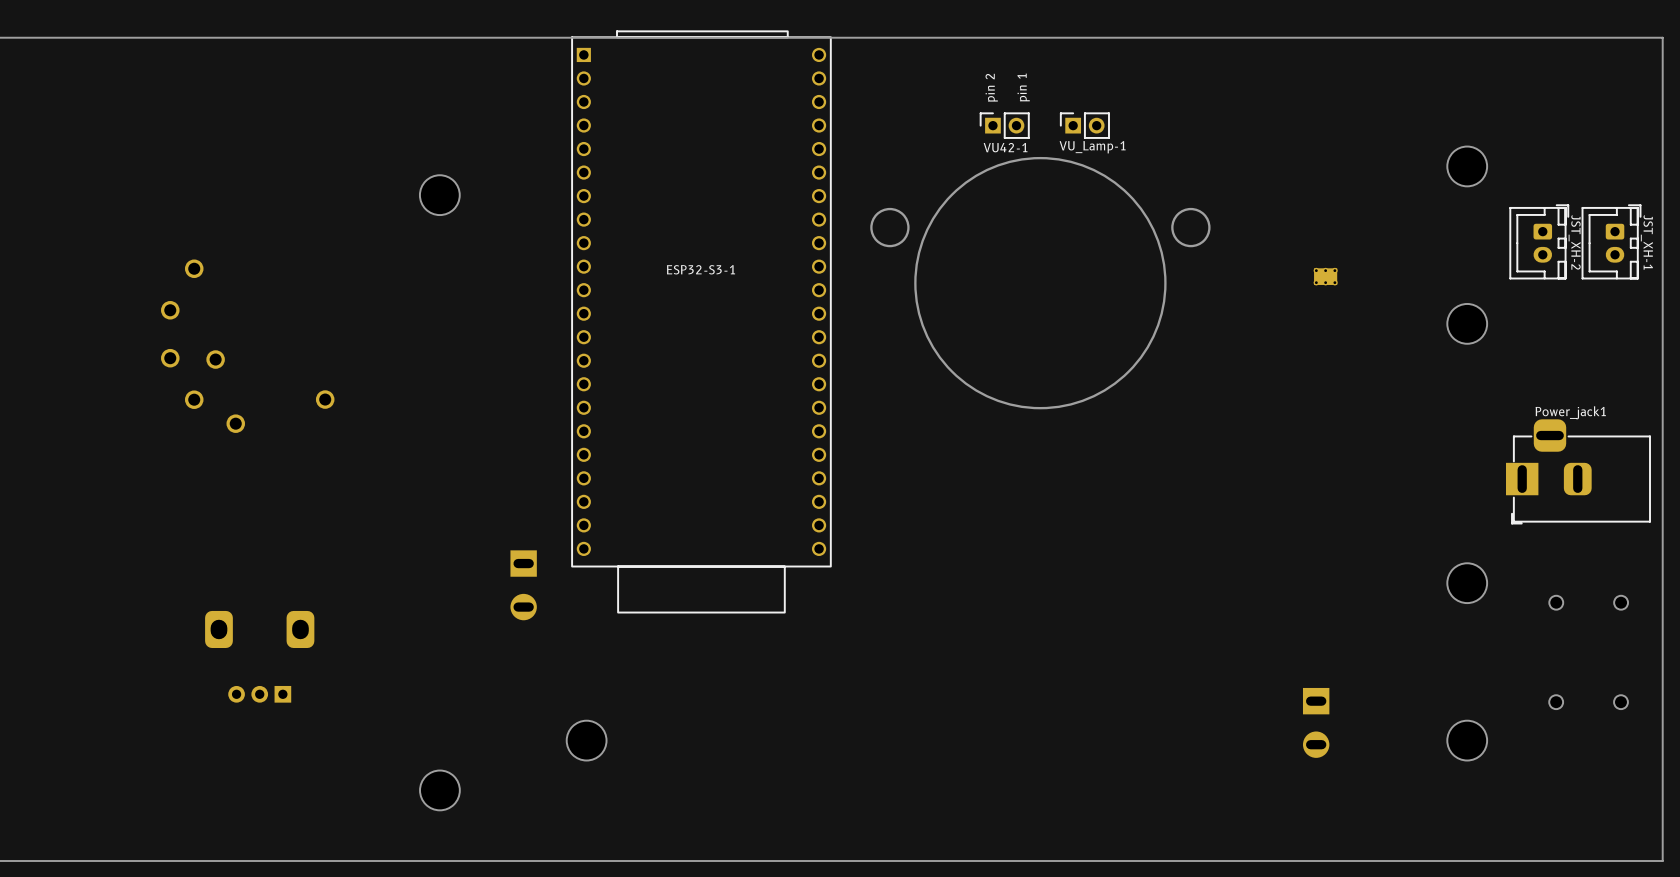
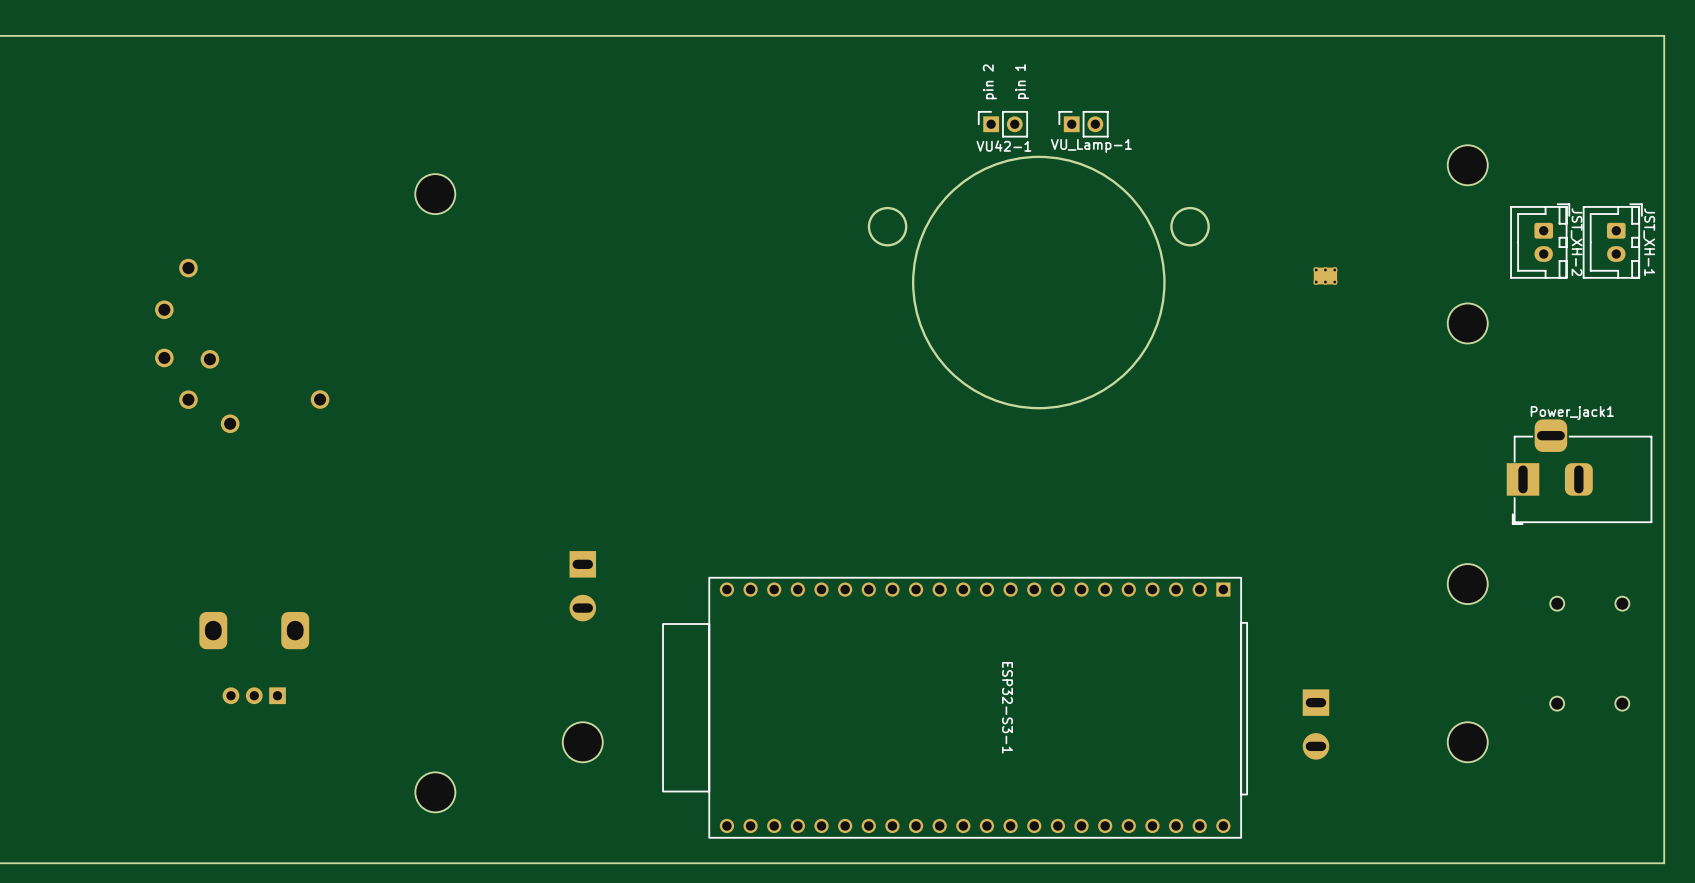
ESP32-S3-1 rotation: 0° (701, 321) -> 90° clockwise (955, 707)
ESP32-S3-1 position: (701, 321) -> (955, 707)
part position: (523, 585) -> (582, 586)

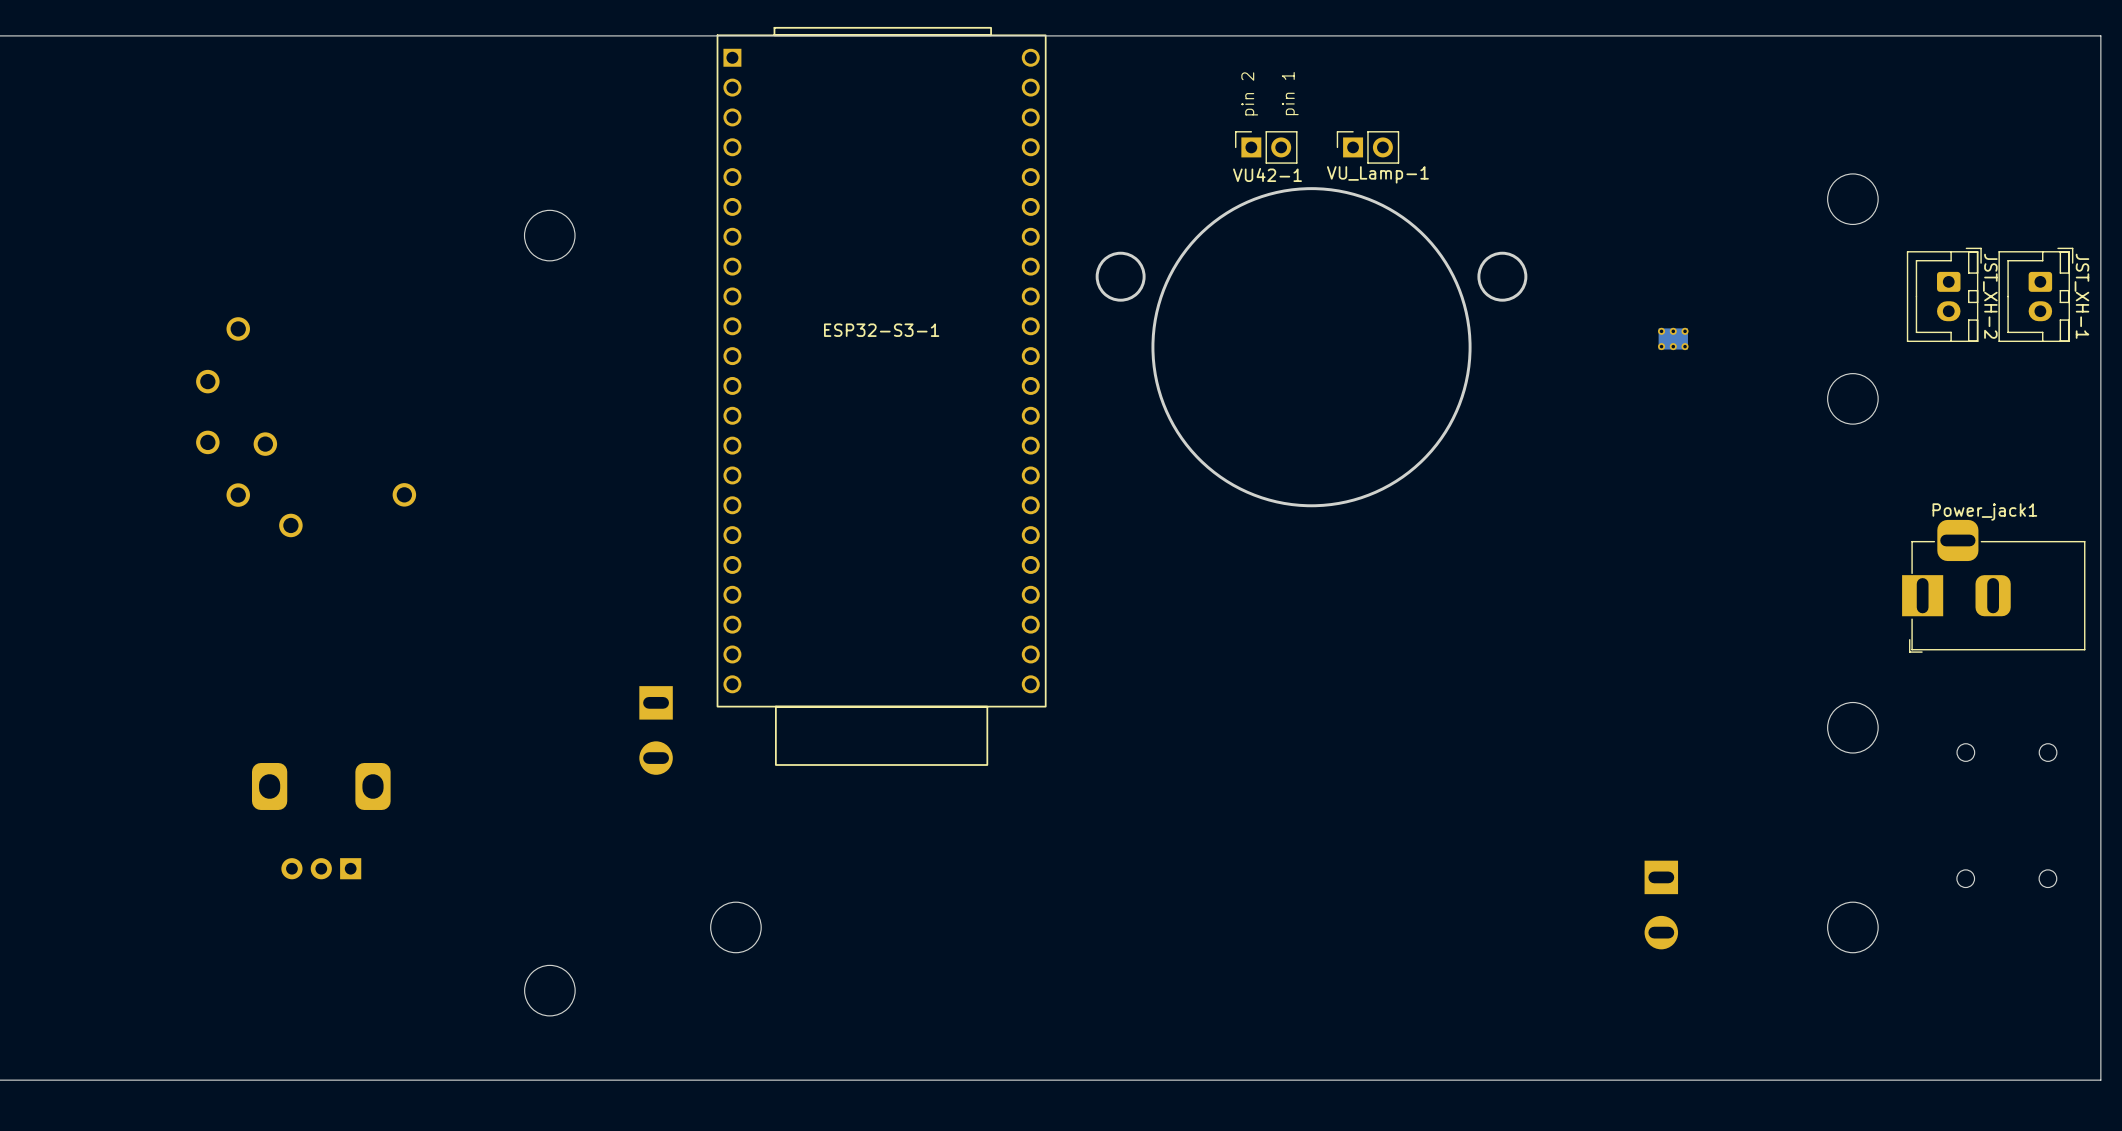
part position: (582, 586) -> (656, 730)
ESP32-S3-1 rotation: 0° (955, 707) -> 90° counterclockwise (881, 396)
ESP32-S3-1 position: (955, 707) -> (881, 396)

